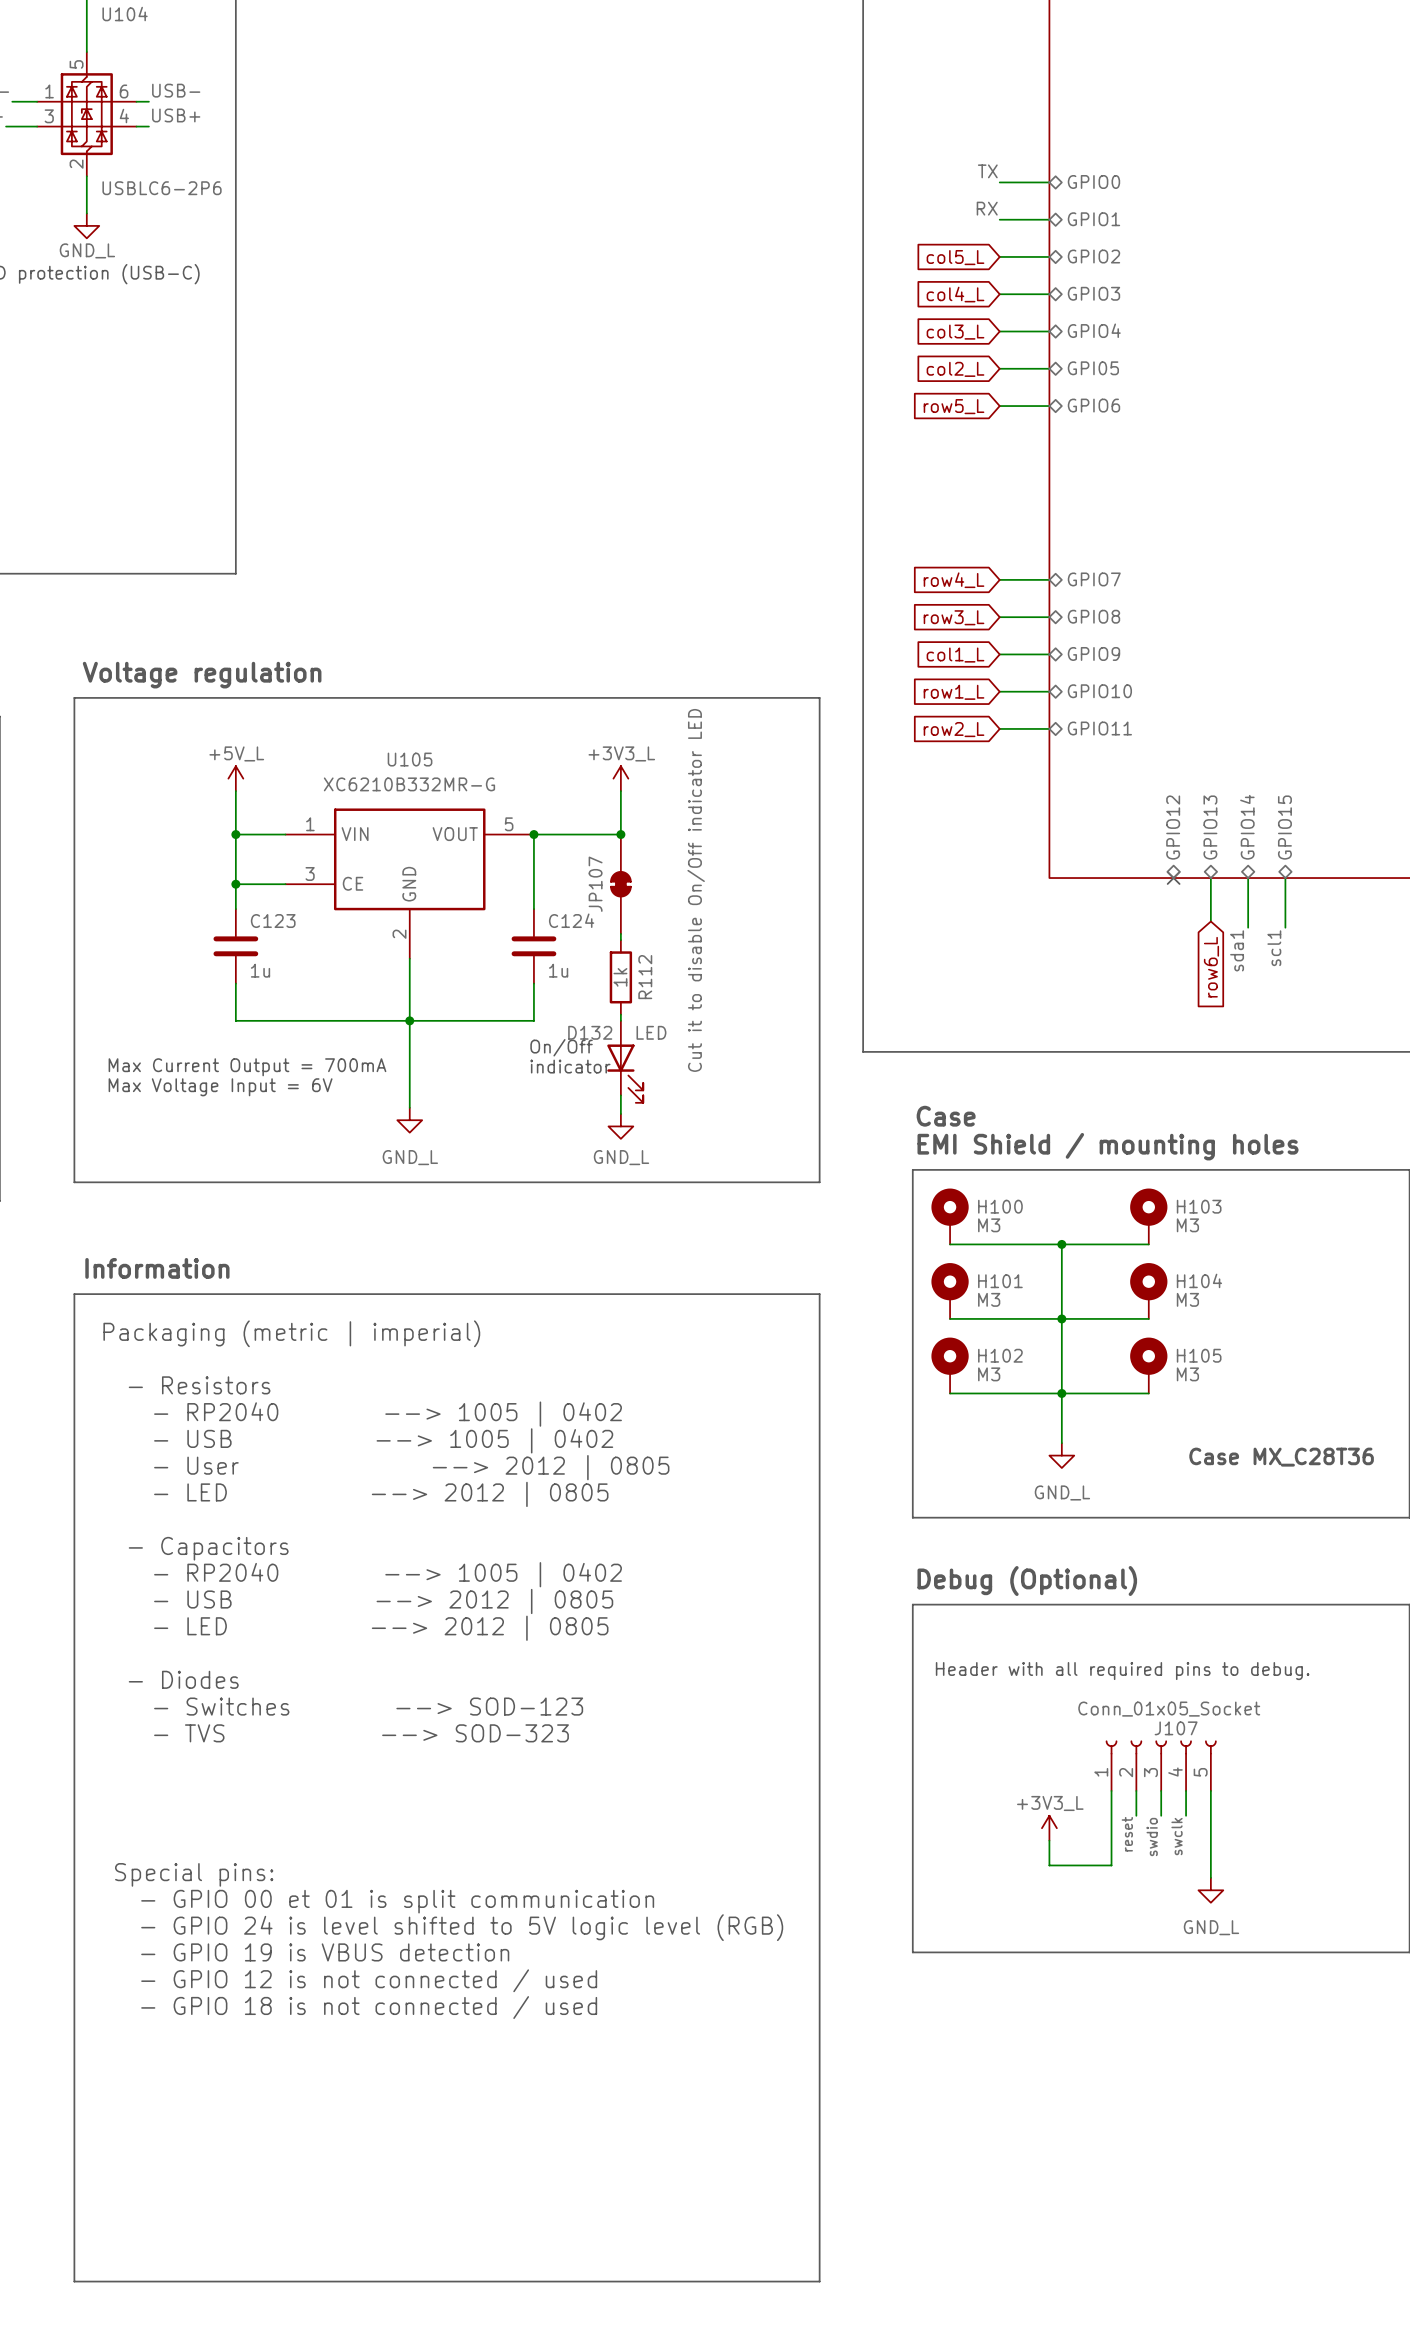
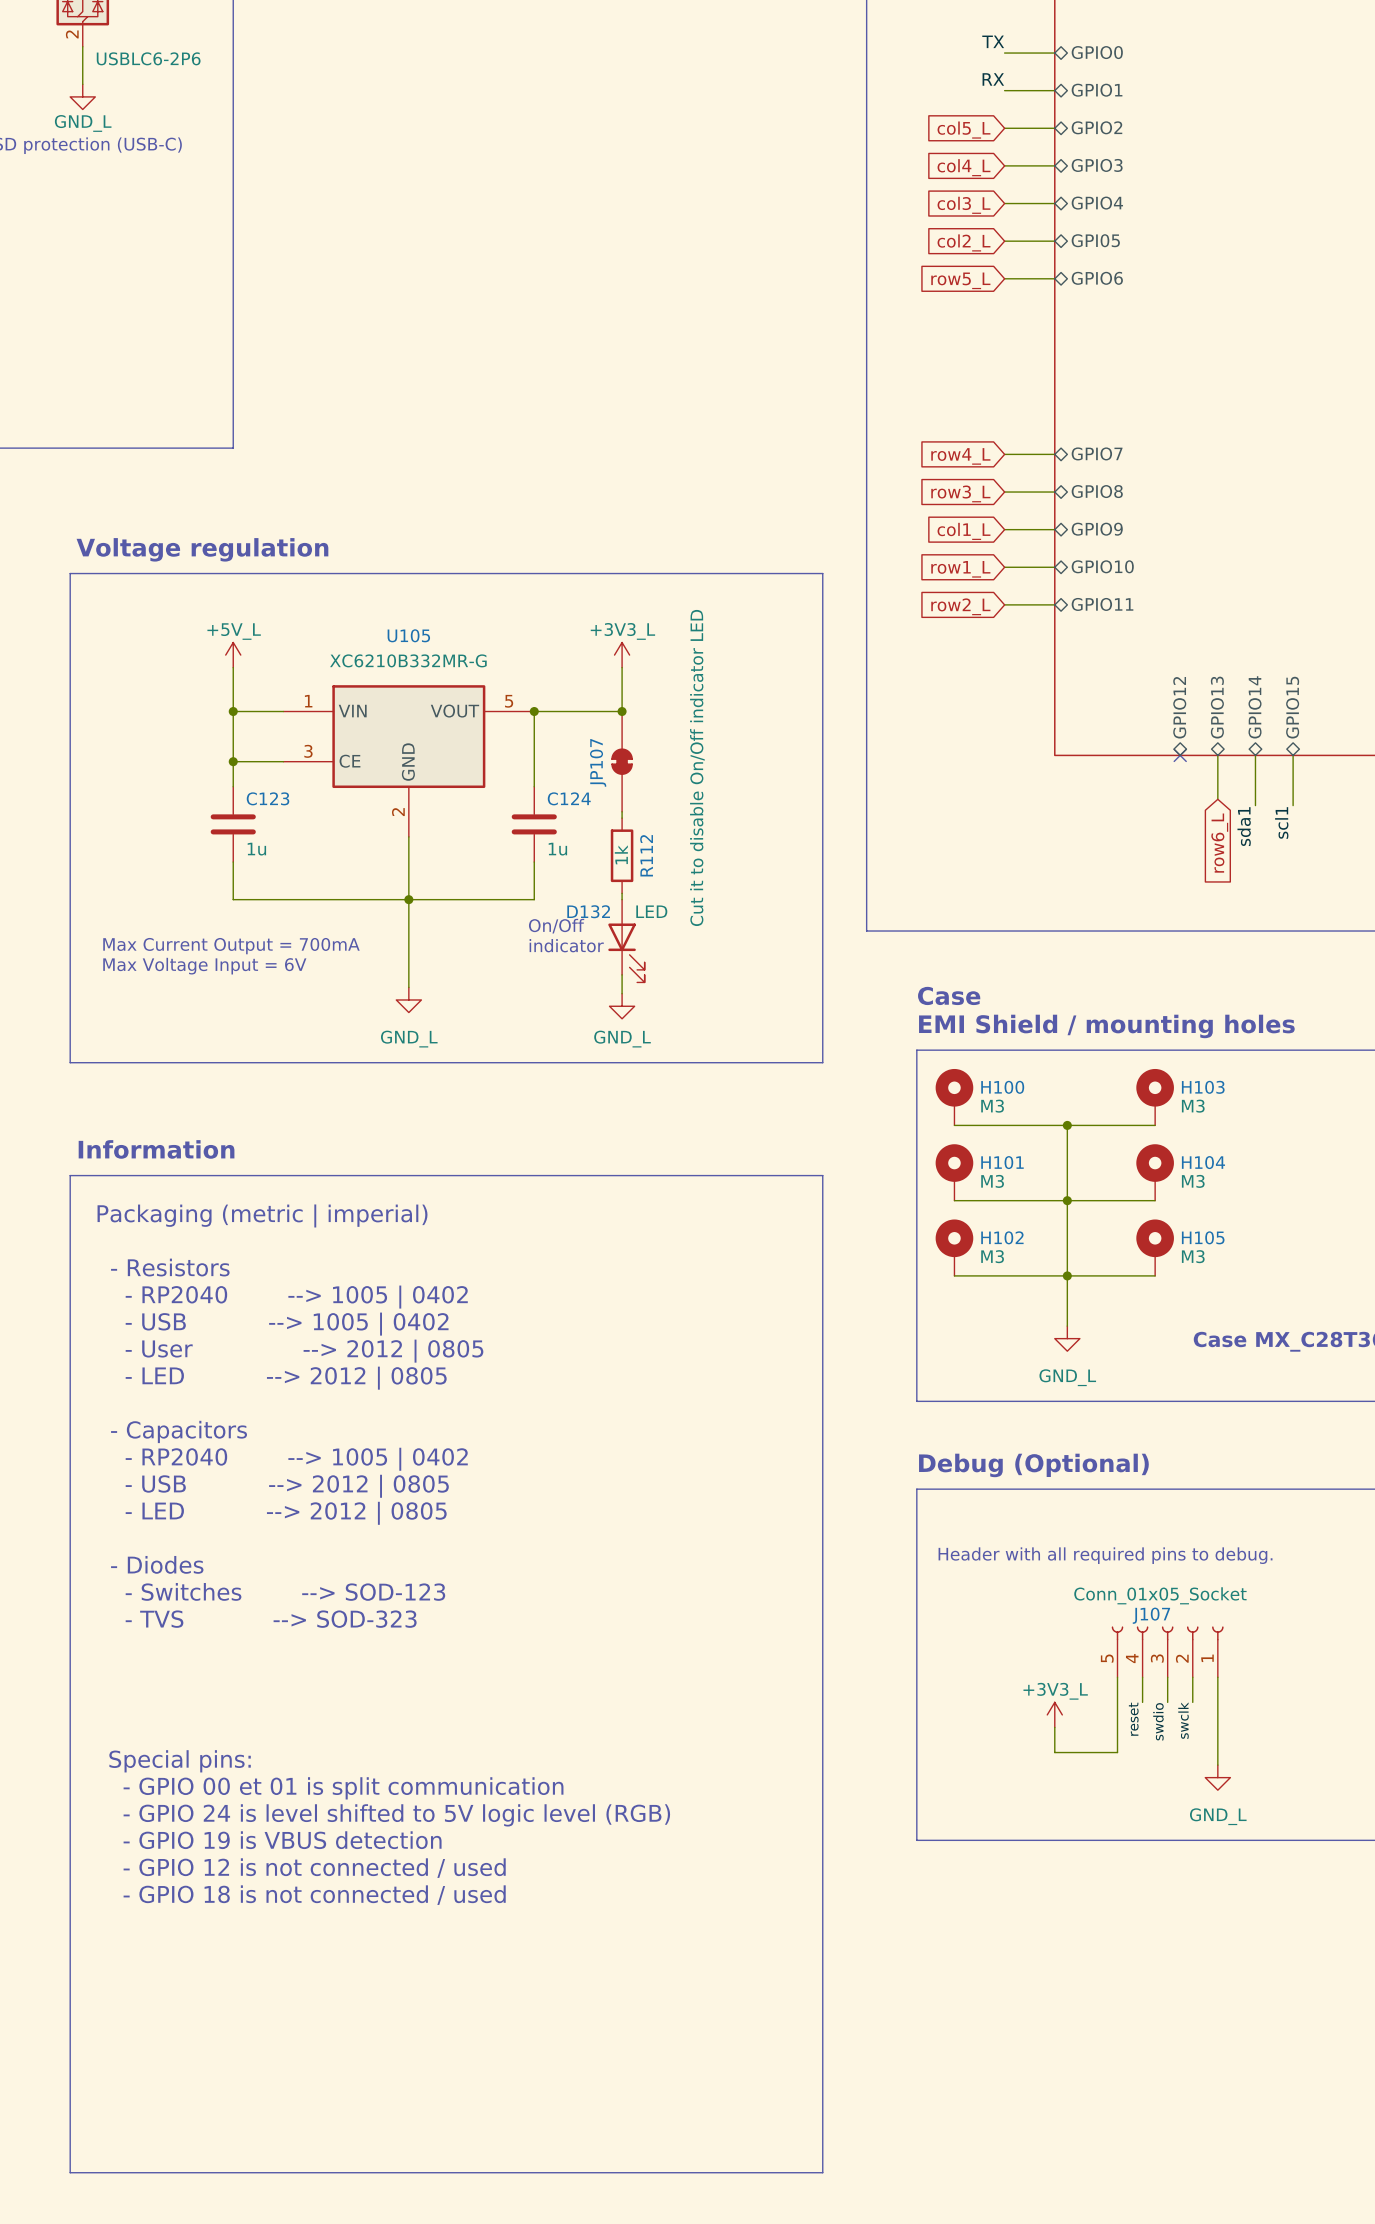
J107 flip: as is (1161, 1747) -> left-right (1167, 1633)

